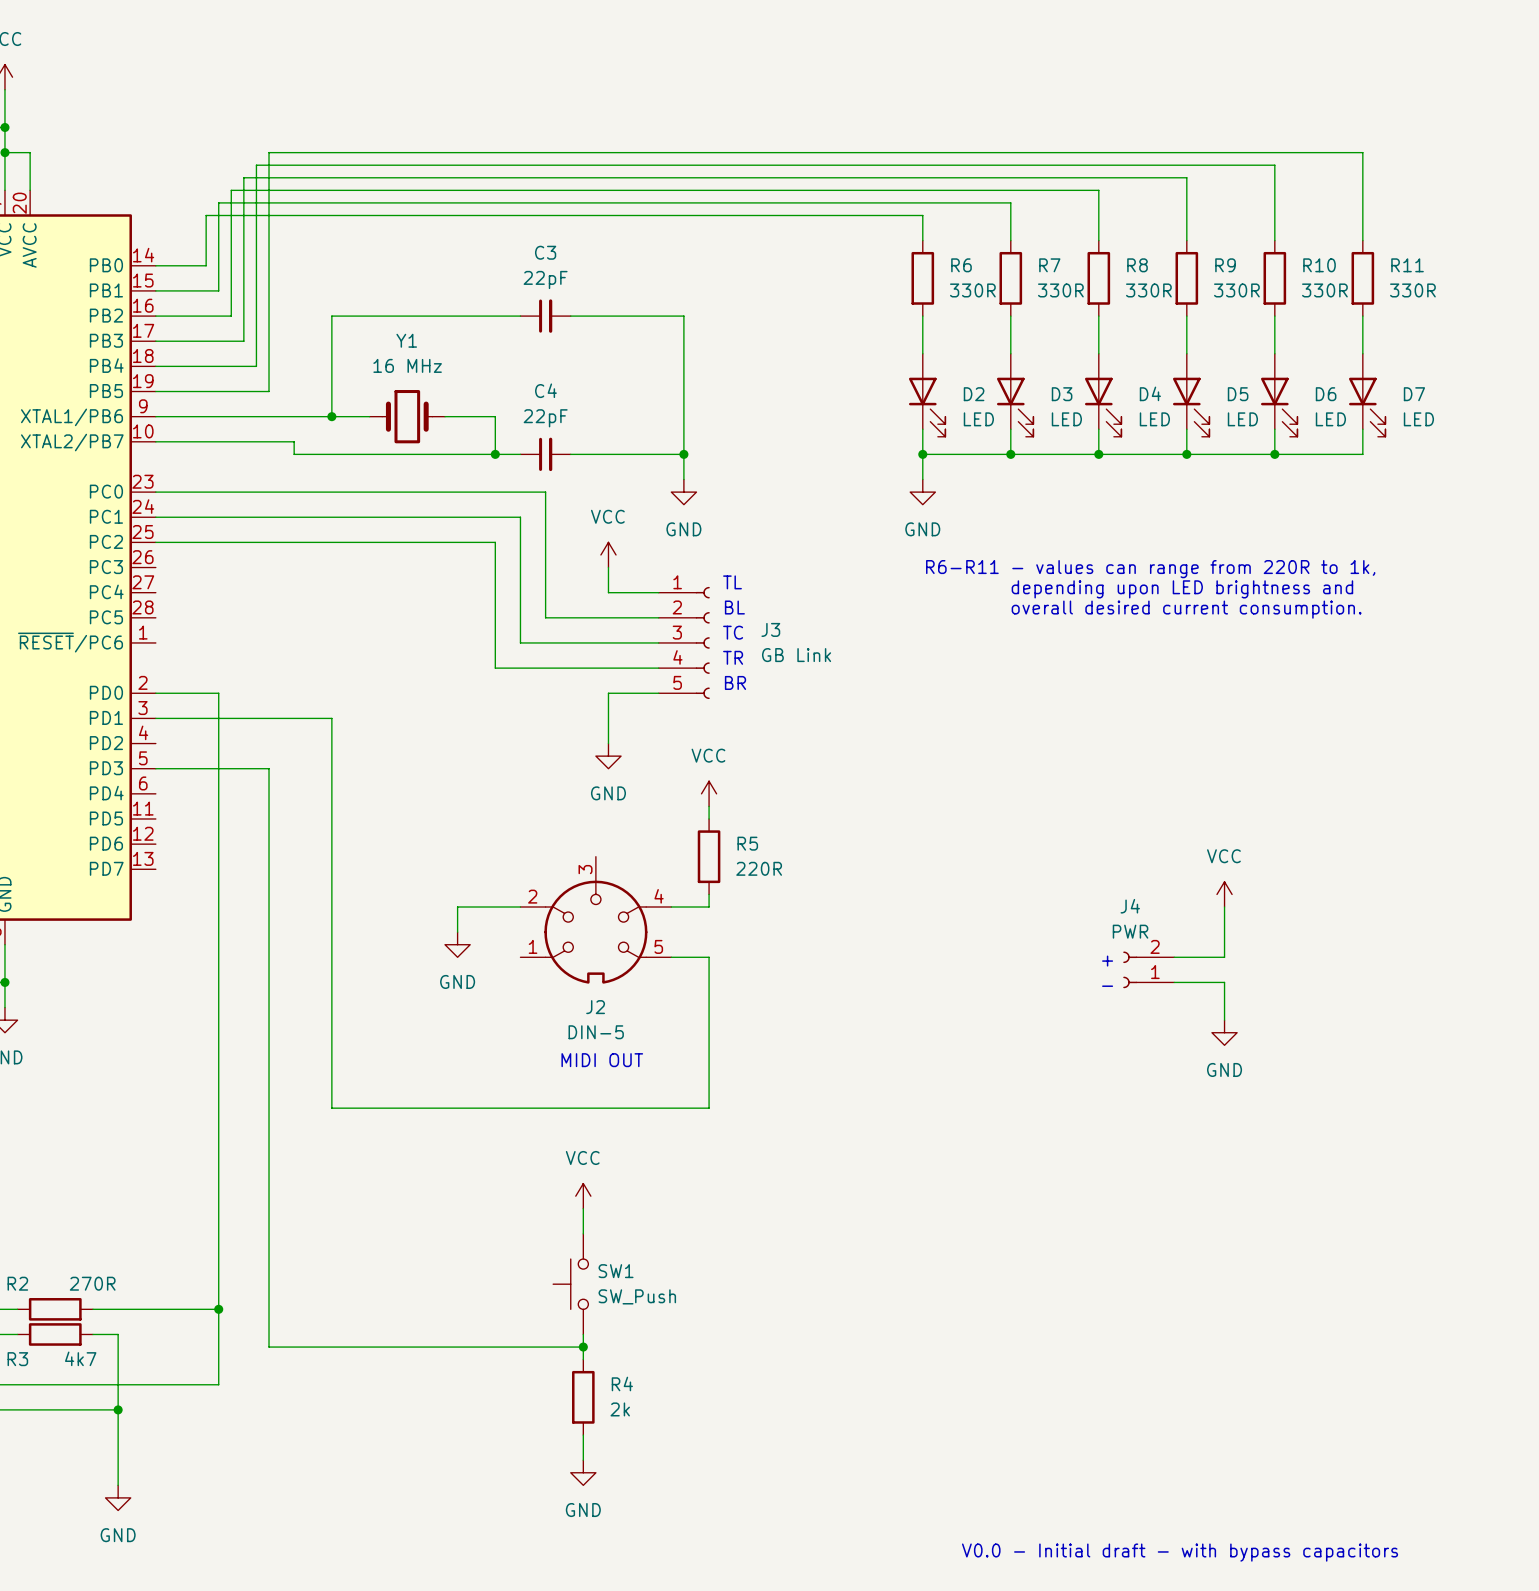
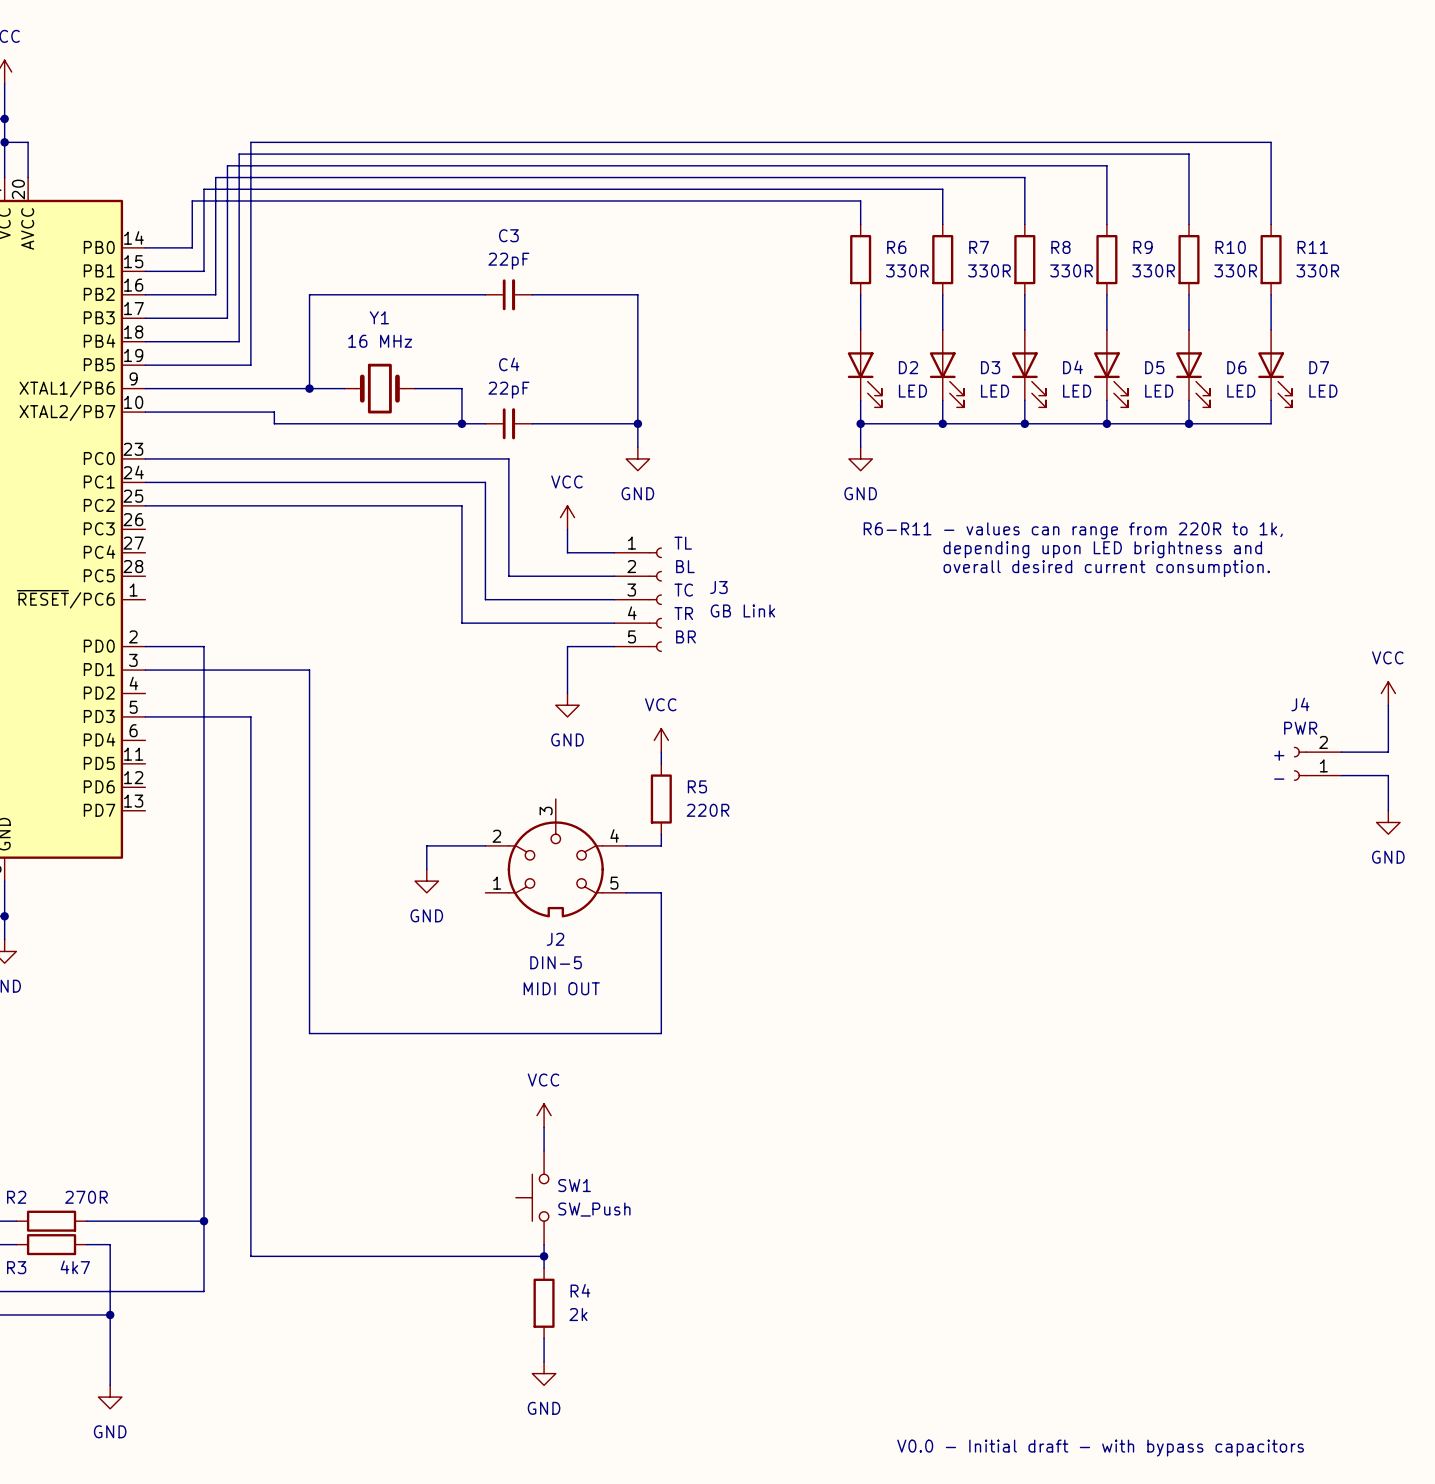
power symbol: none -> VCC (1388, 693)
wire: none -> (1388, 705) (1388, 752) (1341, 752)
text: none -> + (1279, 755)
wire: none -> (1341, 775) (1388, 775) (1388, 810)
text: none -> - (1279, 779)
power symbol: none -> GND (1388, 822)
power symbol: VCC (1224, 894) -> none
wire: (1224, 907) (1224, 957) (1174, 957) -> none
text: + (1107, 961) -> none
J4 position: (1148, 969) -> (1317, 763)
wire: (1174, 982) (1224, 982) (1224, 1020) -> none
text: - (1107, 986) -> none
power symbol: GND (1224, 1032) -> none

